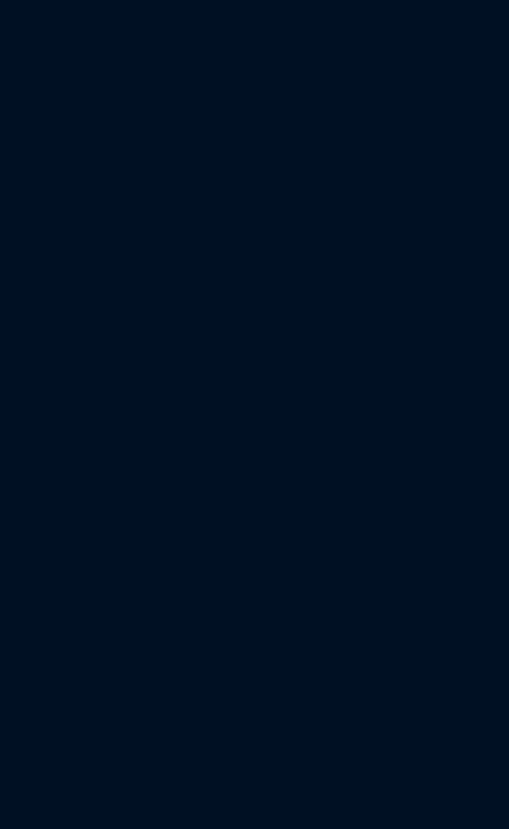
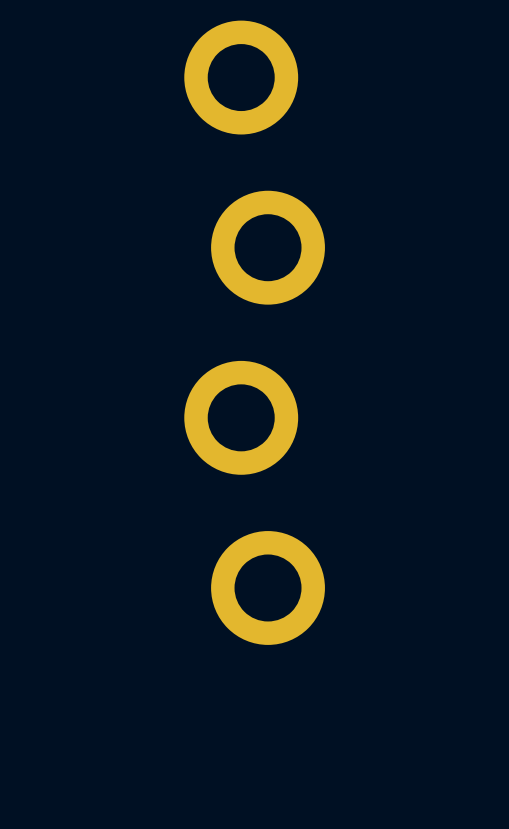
part: none -> (254, 332)

